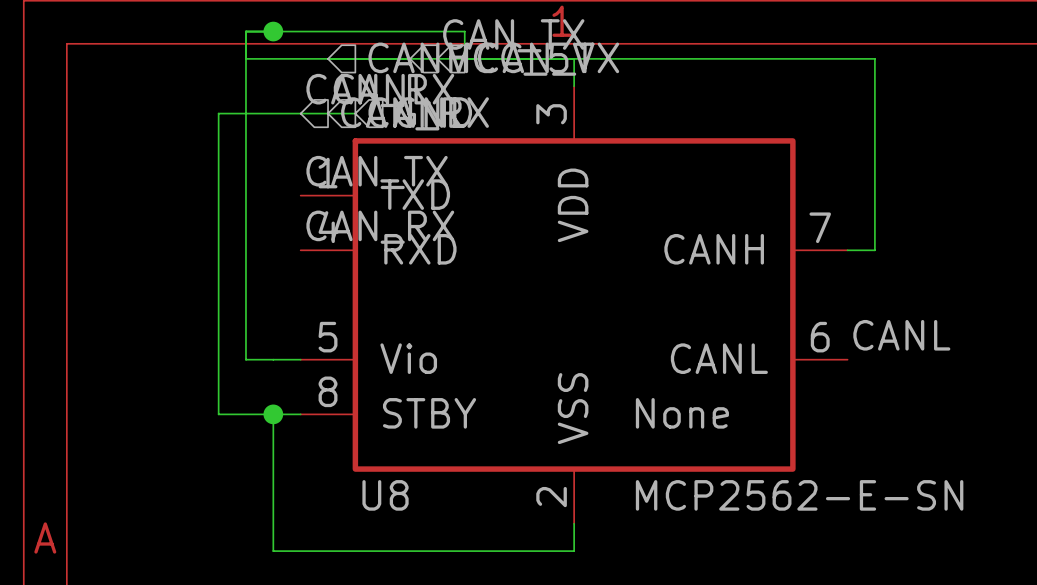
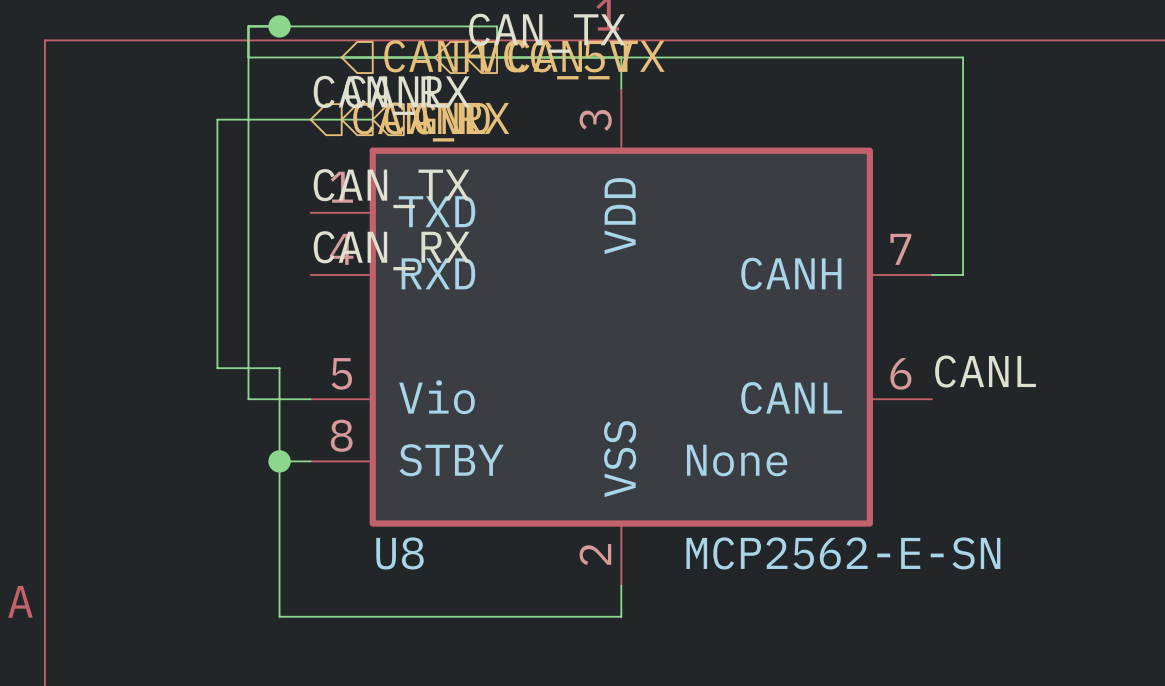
wire: (218, 332) (218, 414) (273, 414) -> (217, 368) (279, 368) (279, 461)

